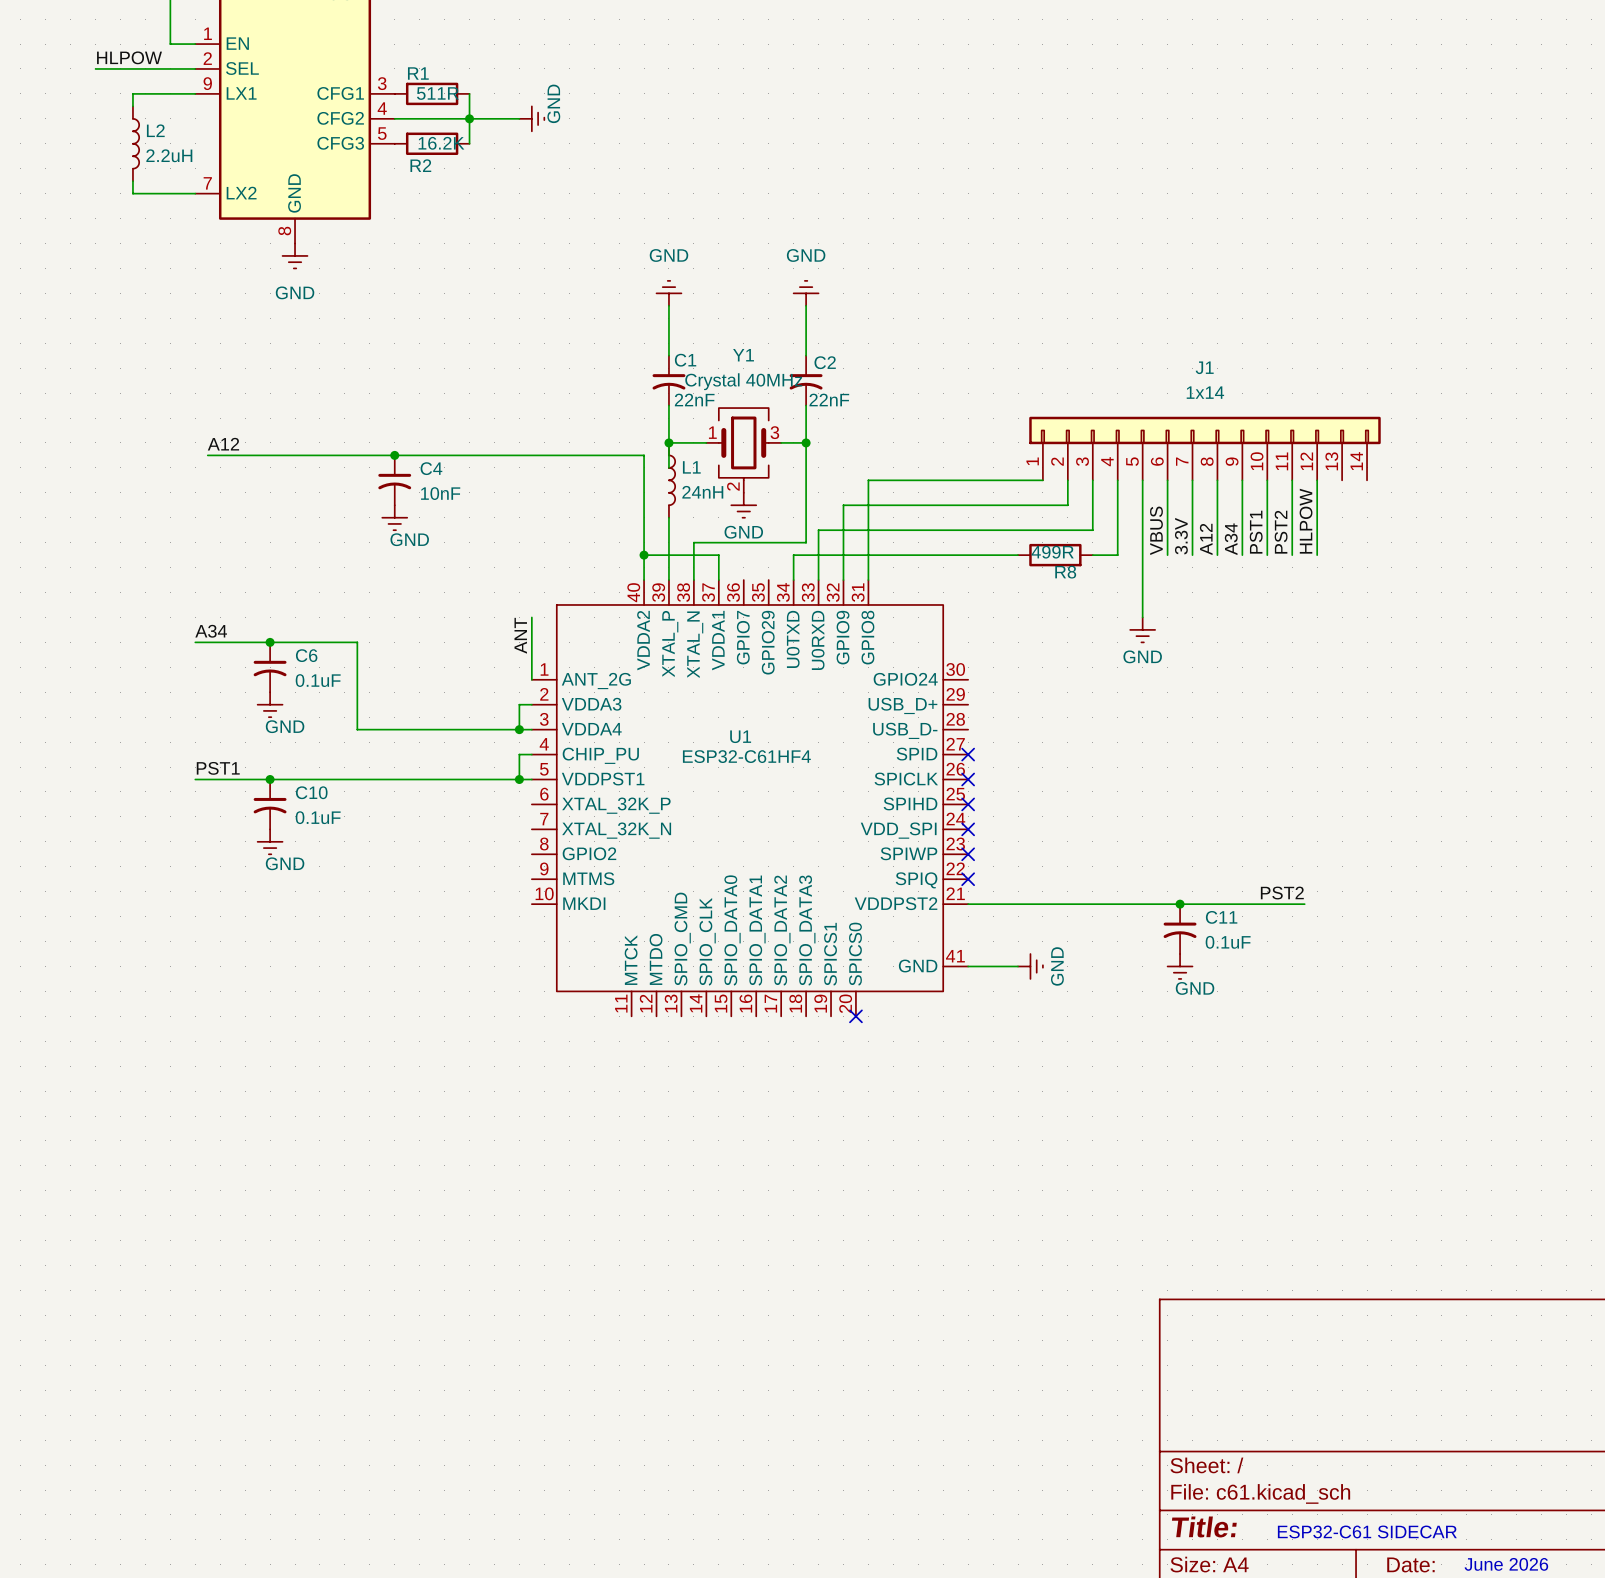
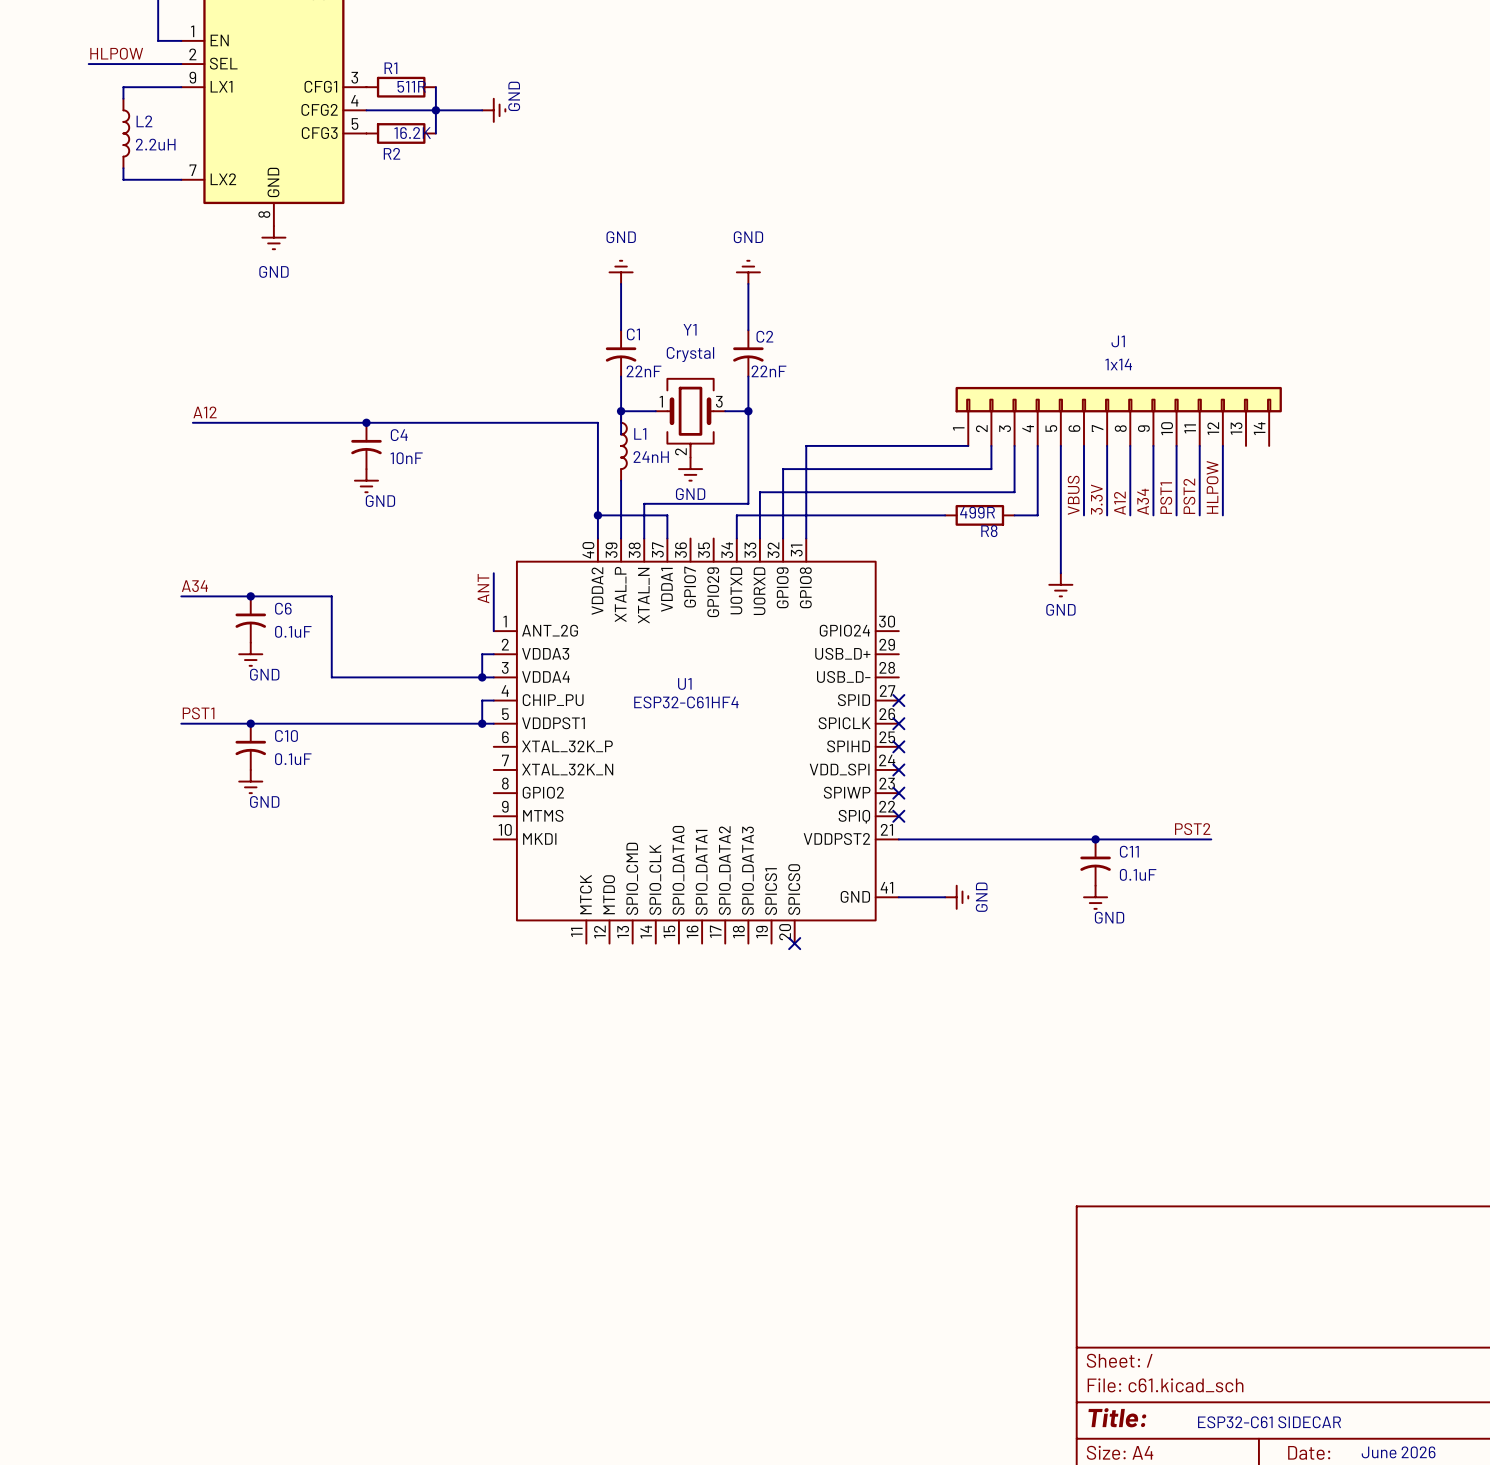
Y1 value: Crystal 40MHz (743, 381) -> Crystal (690, 354)

